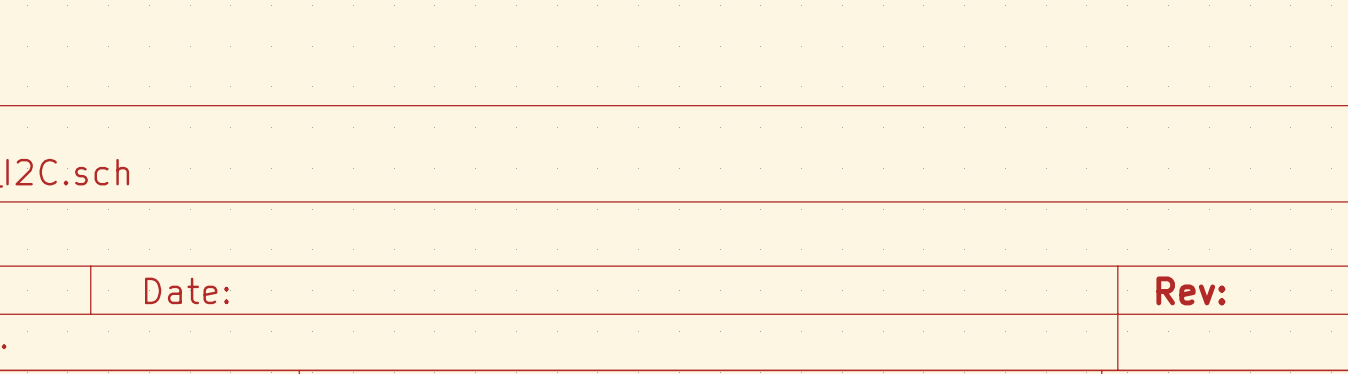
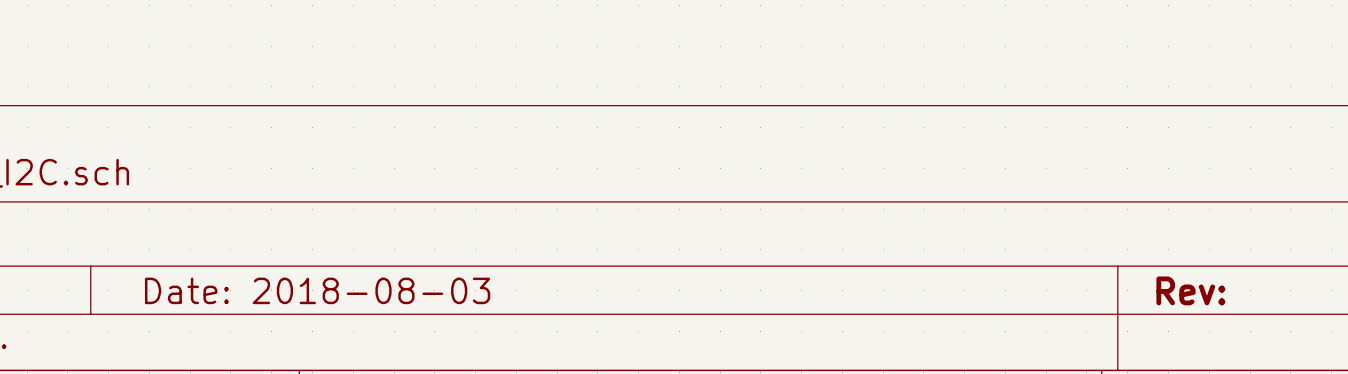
title block: Date: (186, 290) -> Date: 2018-08-03 (317, 290)

